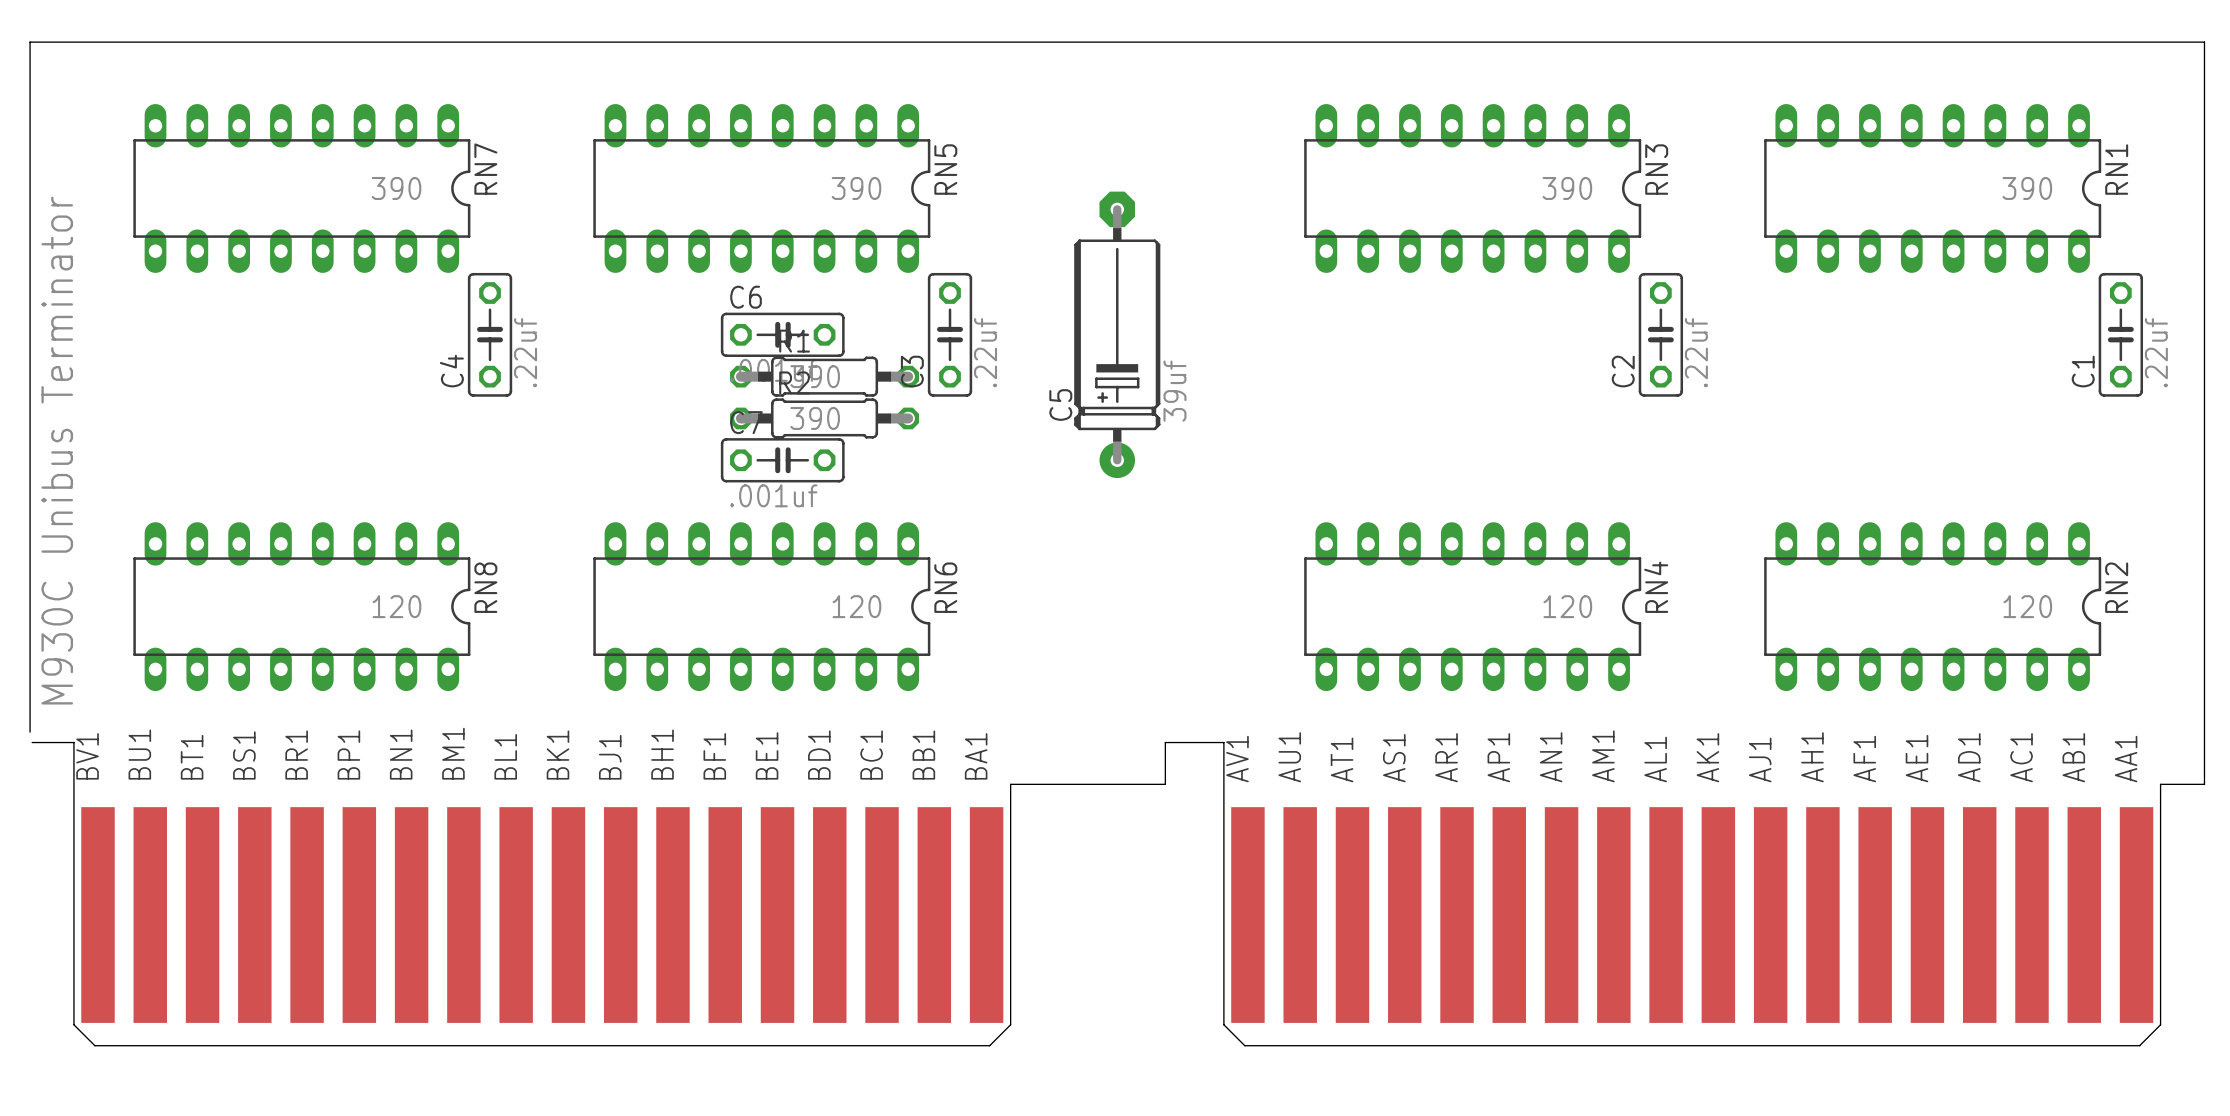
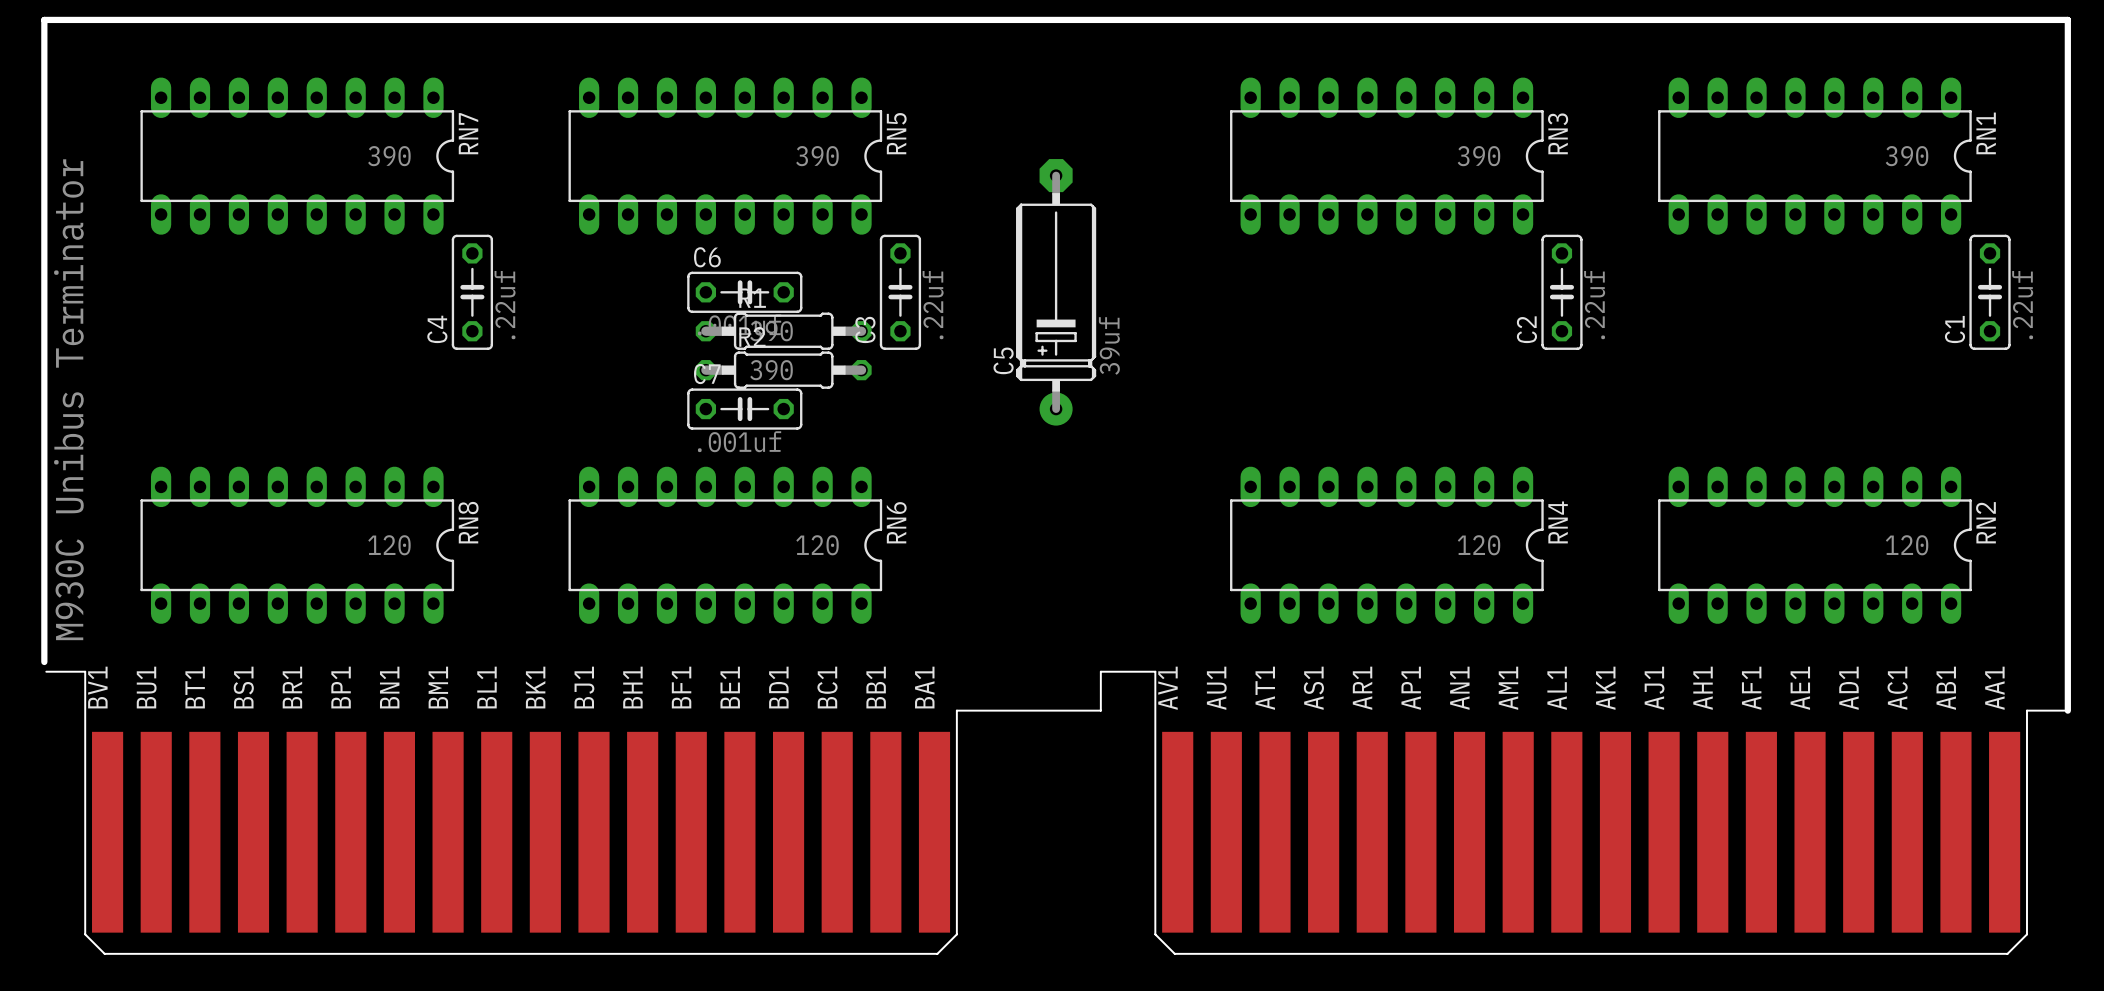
board edge width: thin (30, 732) (30, 42) (2204, 42) (2204, 784) -> thick (44, 662) (44, 19) (2067, 19) (2067, 710)

